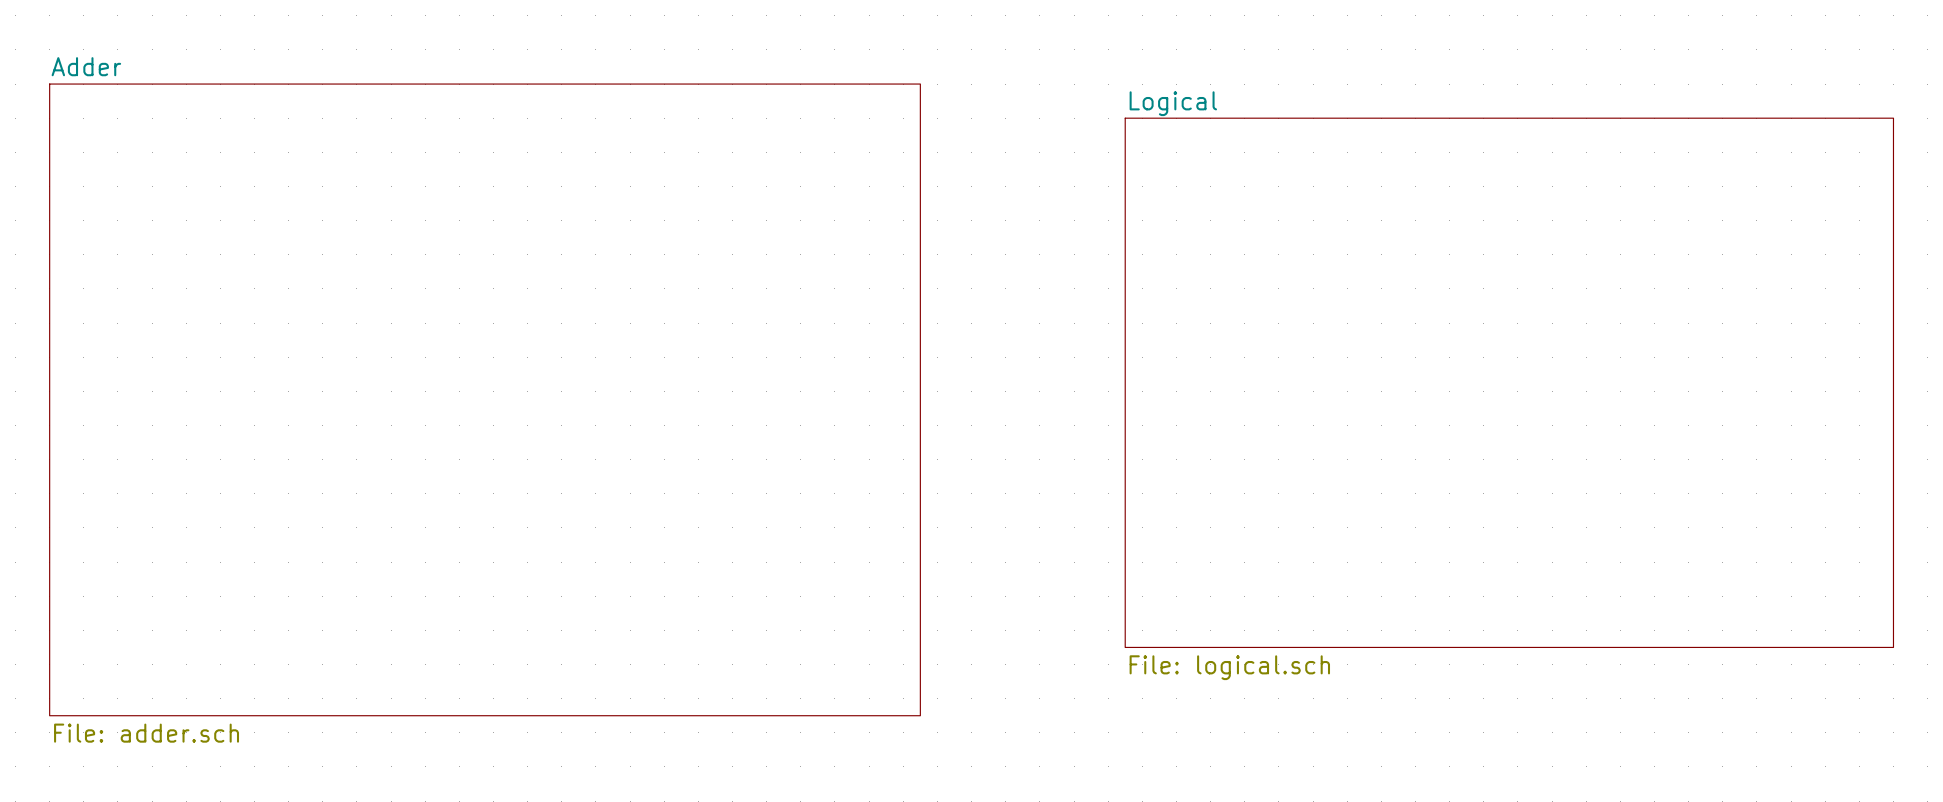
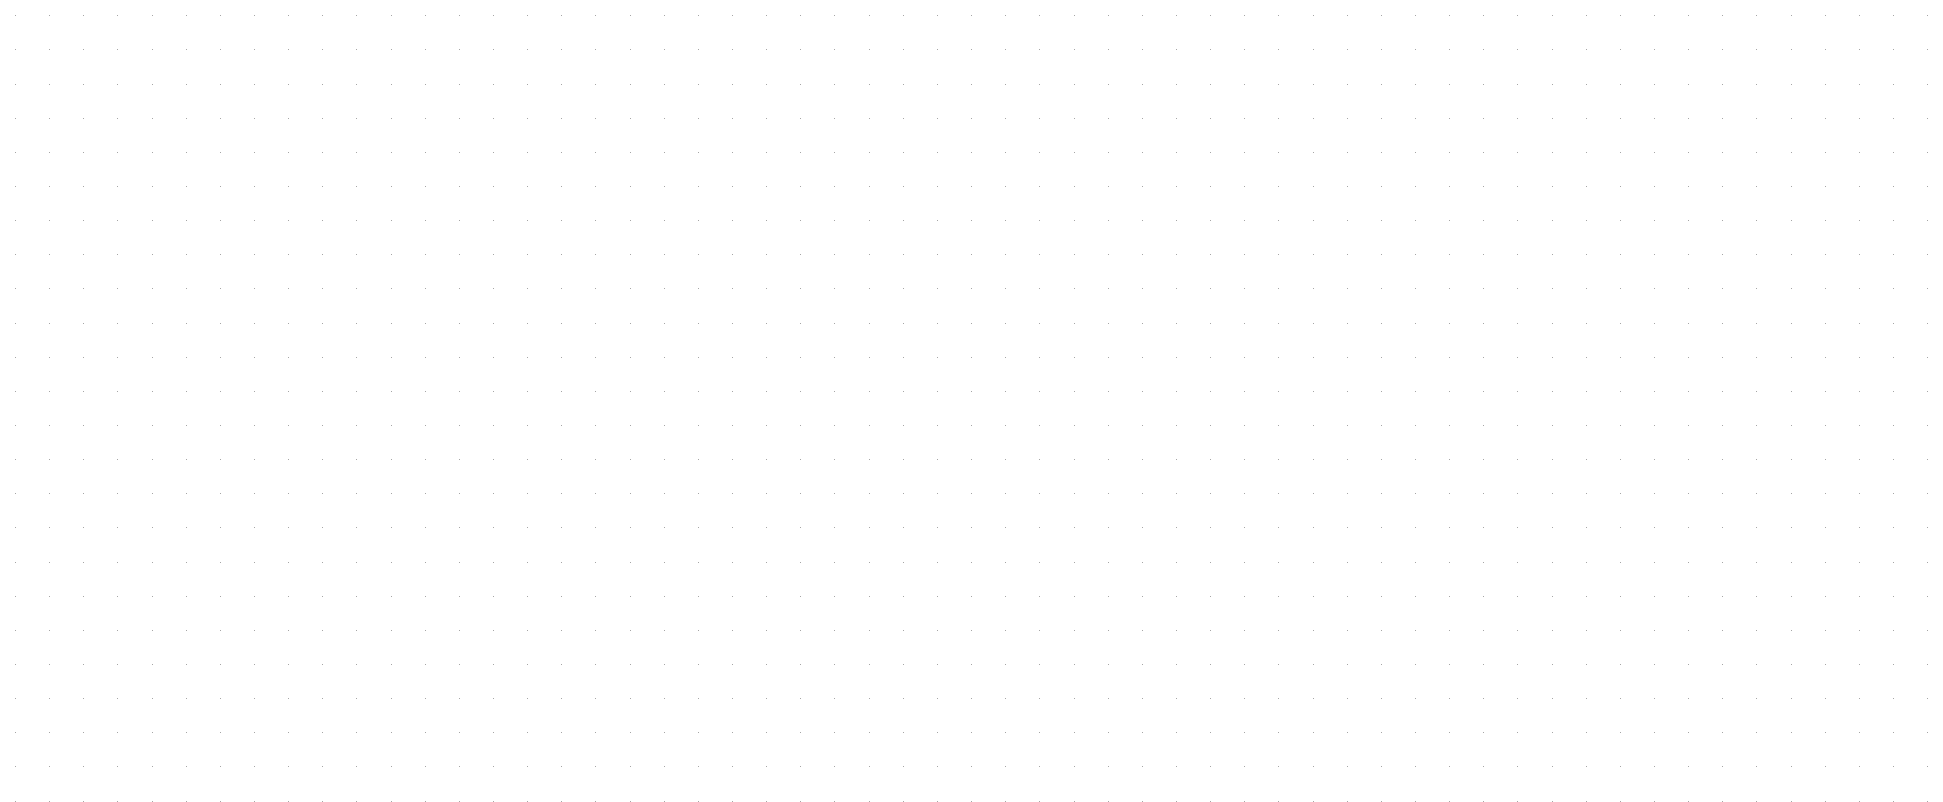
sheet Logical: File: logical.sch (1509, 382) -> none
sheet Adder: File: adder.sch (485, 399) -> none

